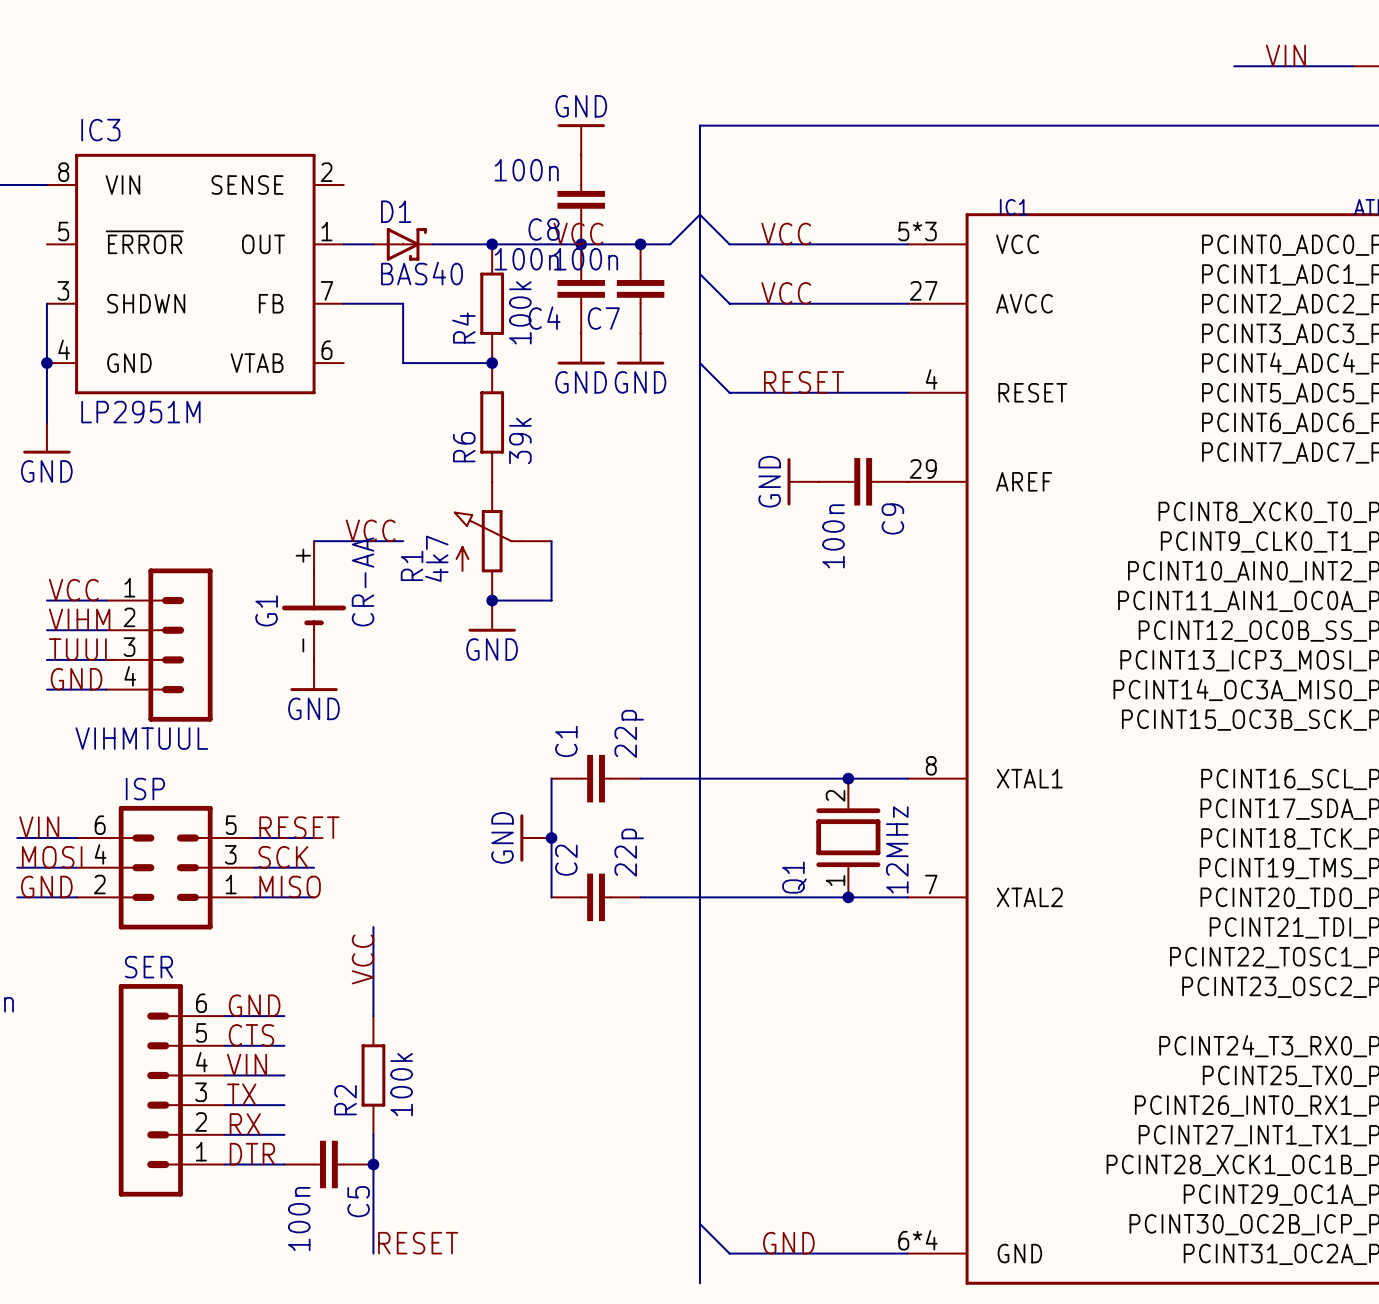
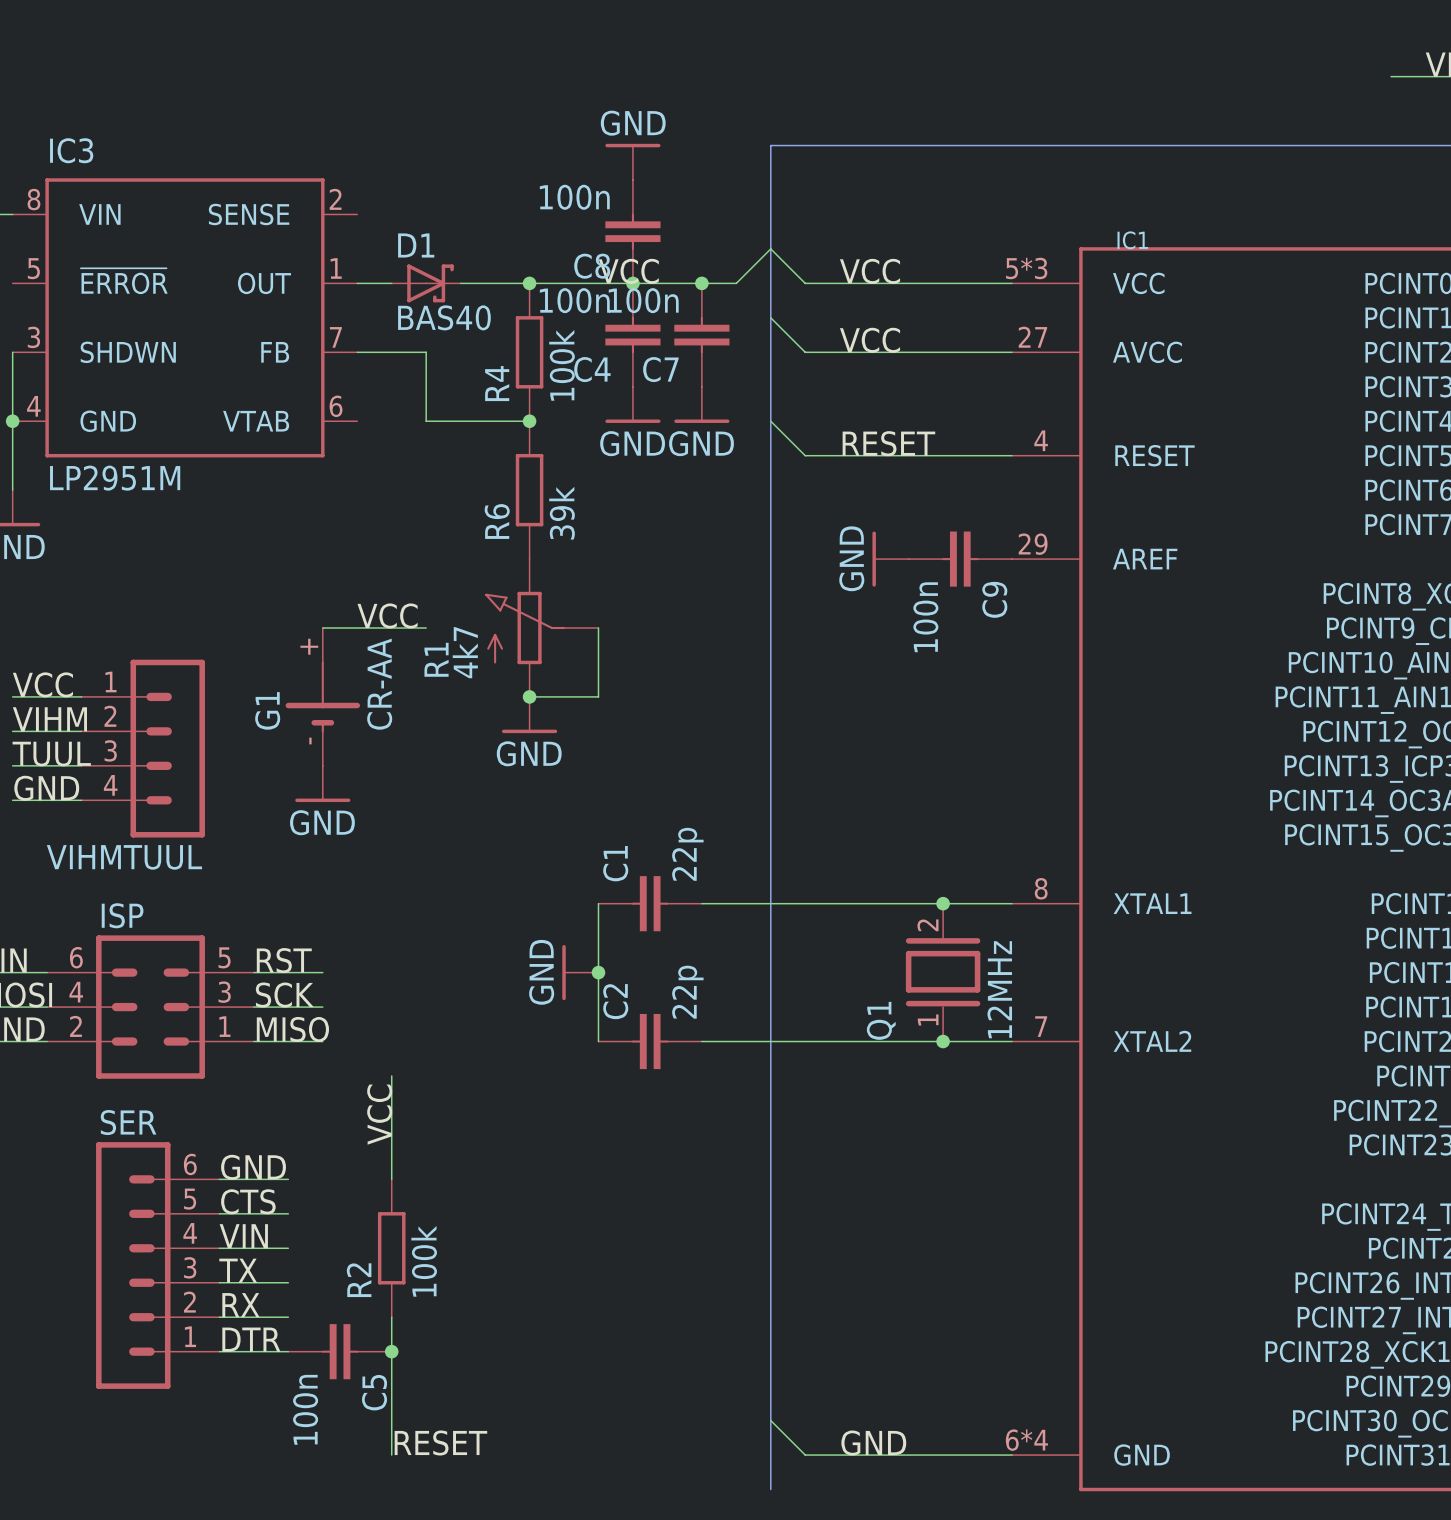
label: RESET (299, 827) -> RST (284, 960)

